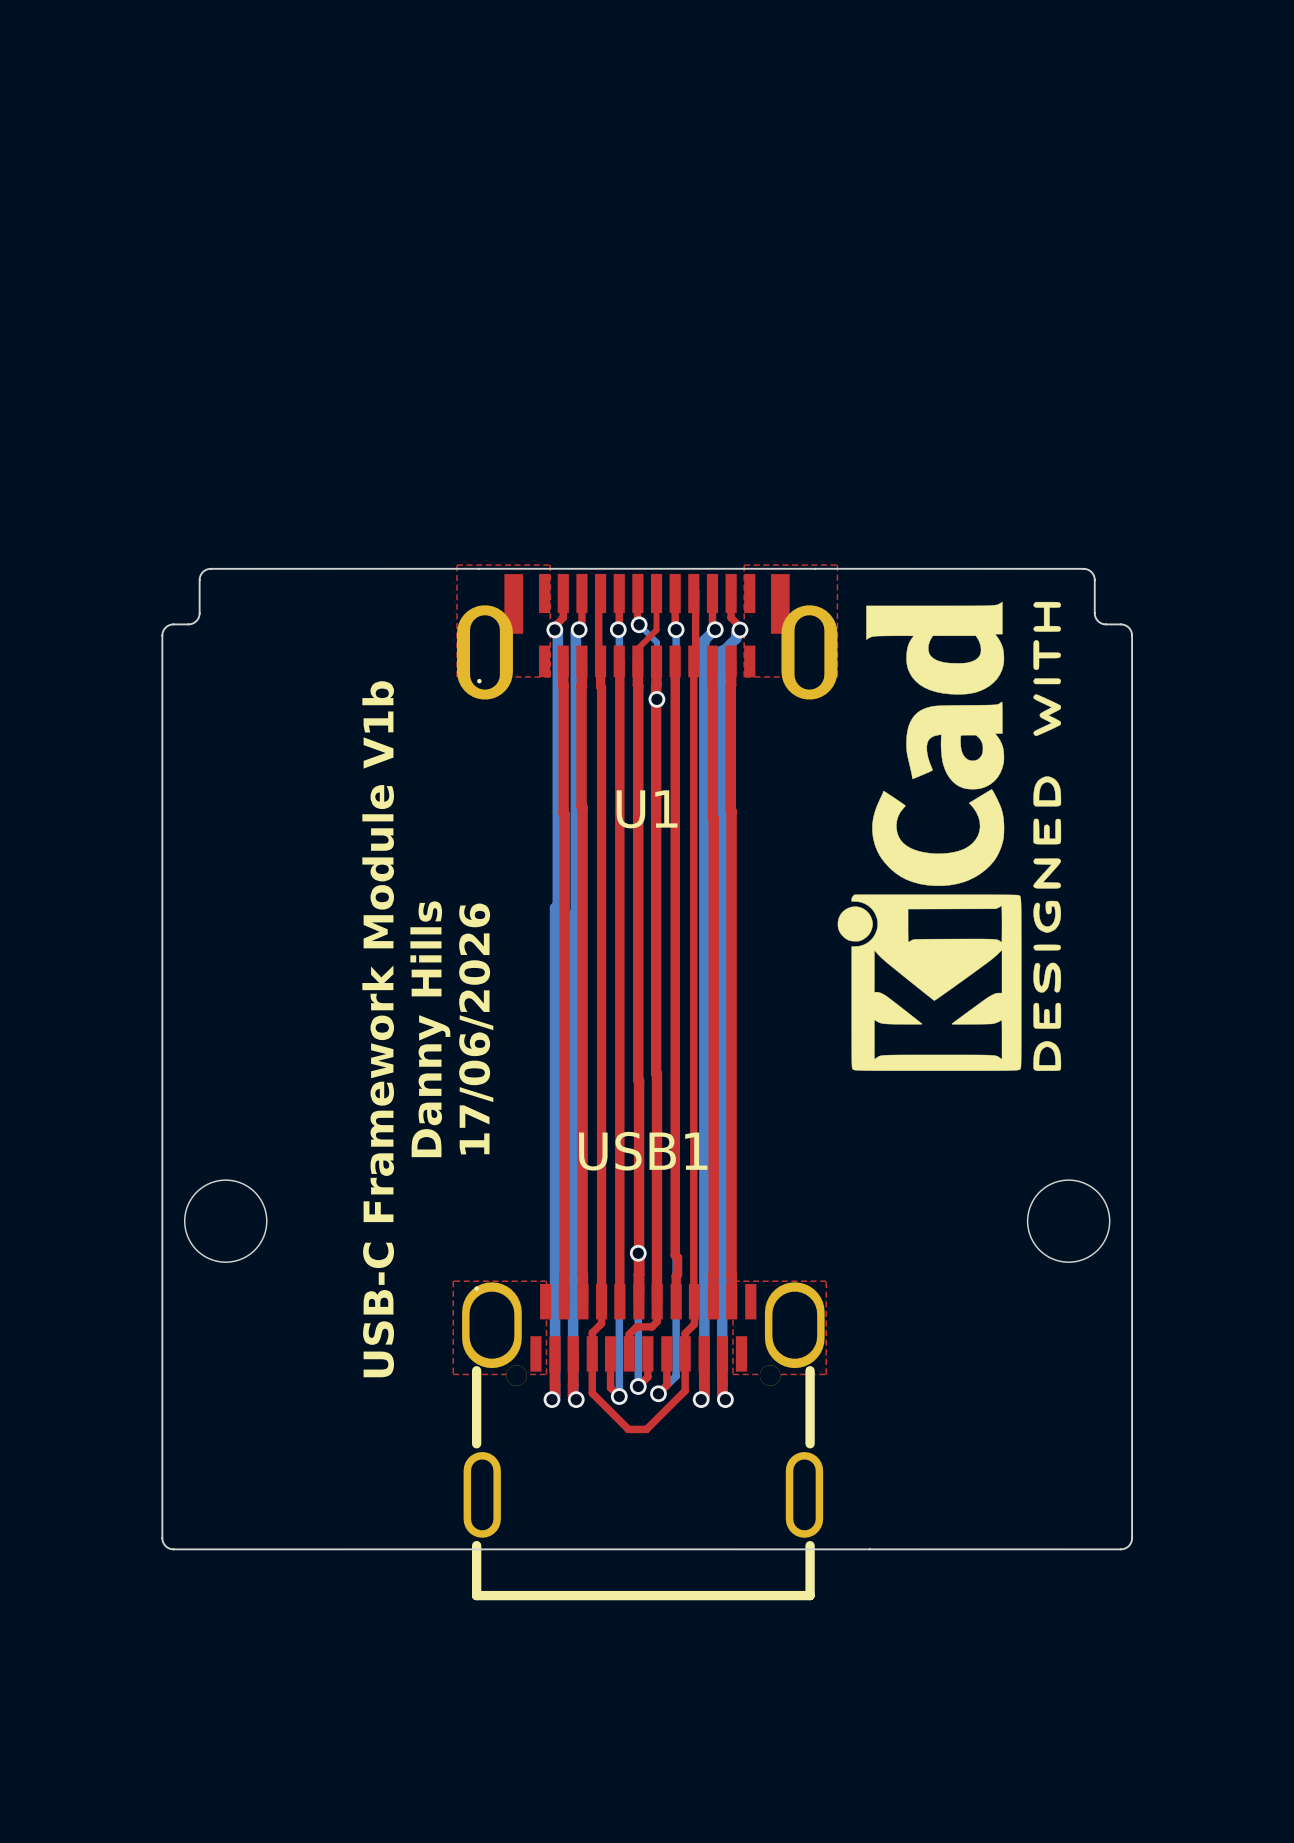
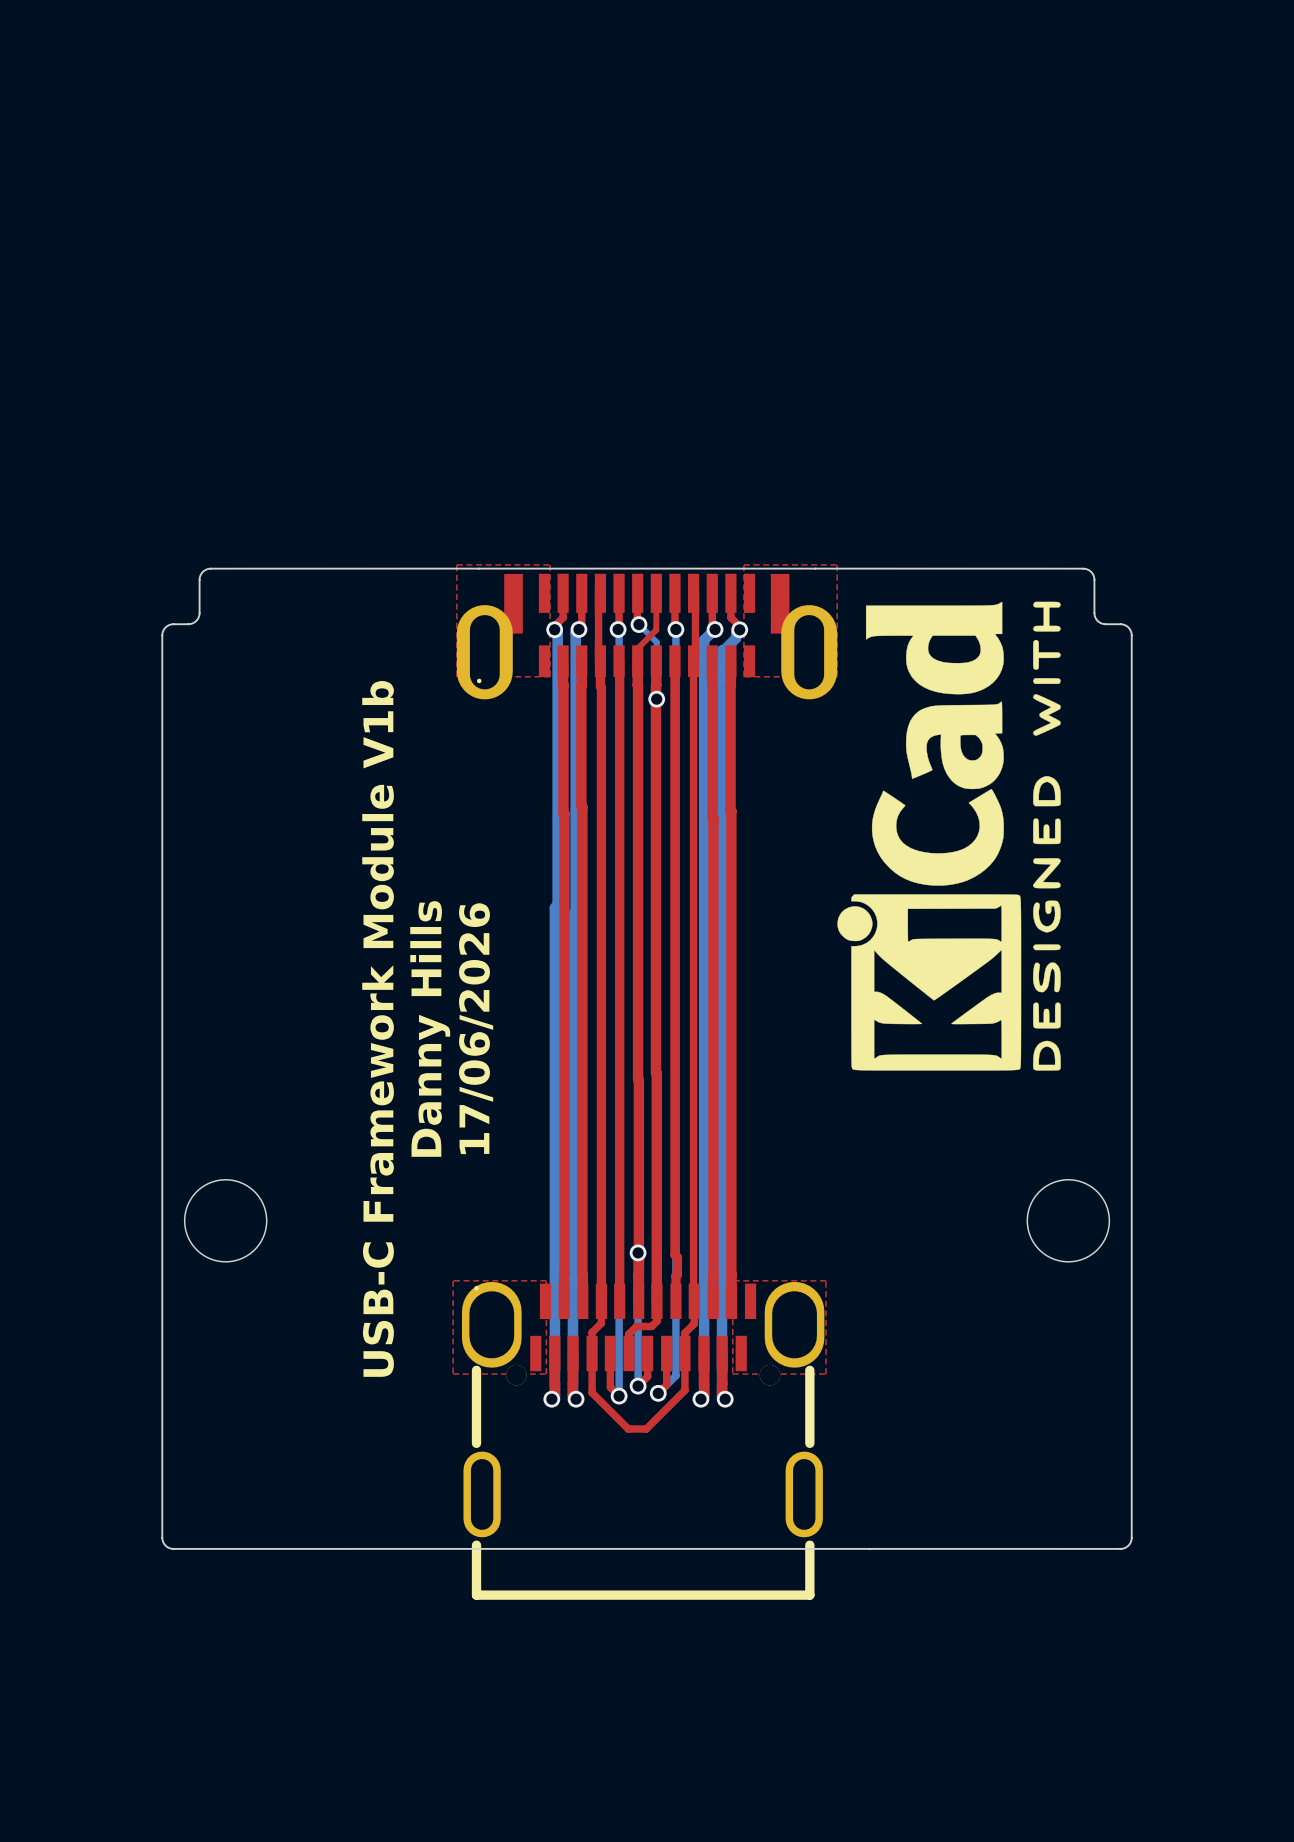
U1 name: U1 (647, 809) -> none
USB1 name: USB1 (643, 1151) -> none

